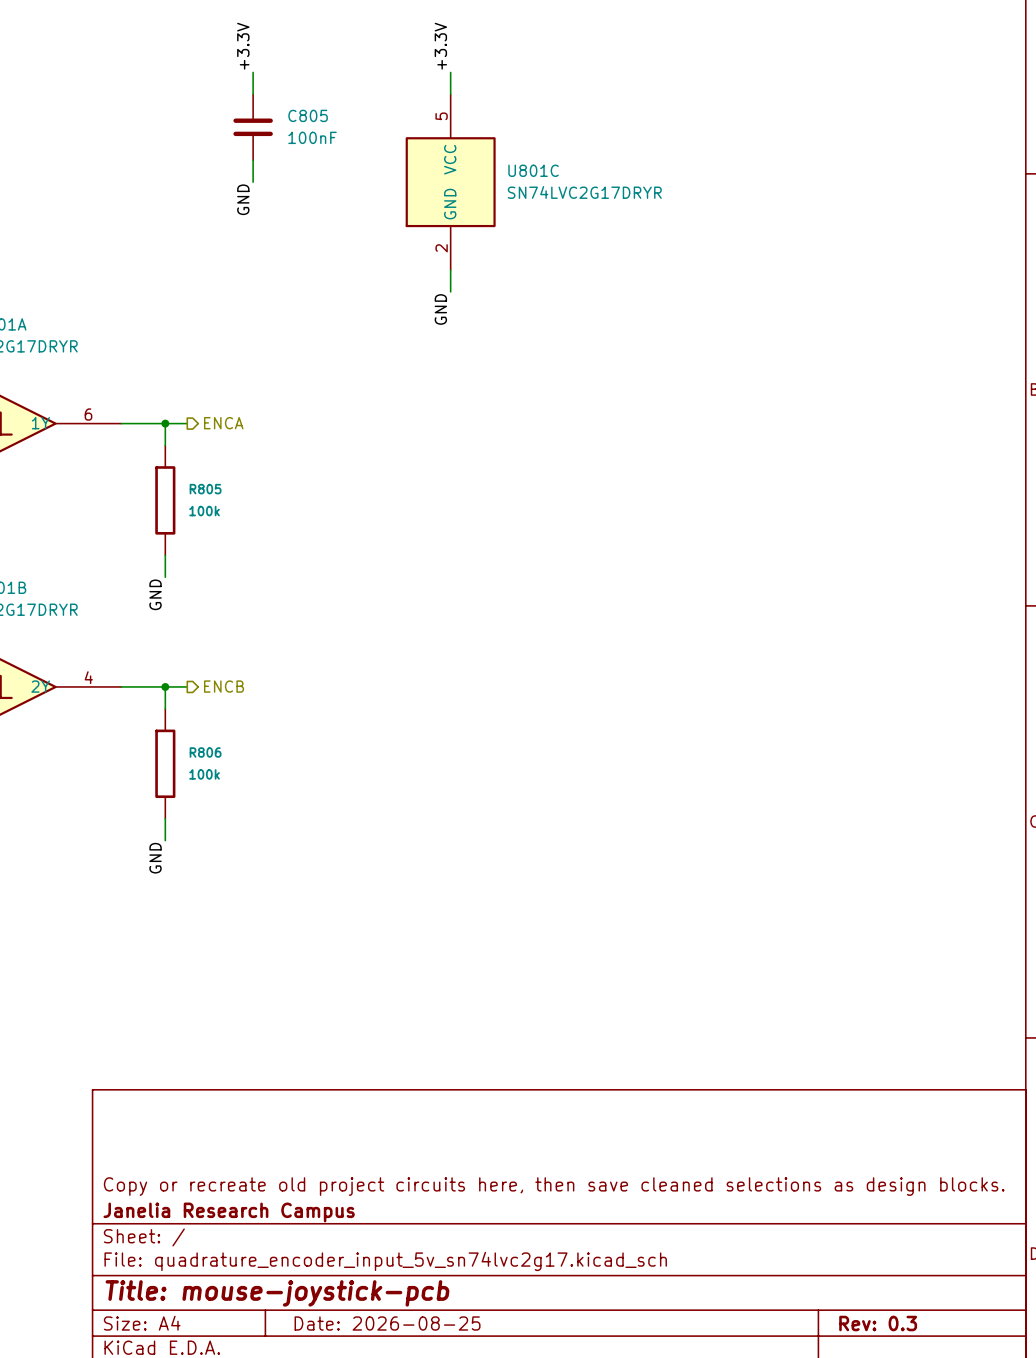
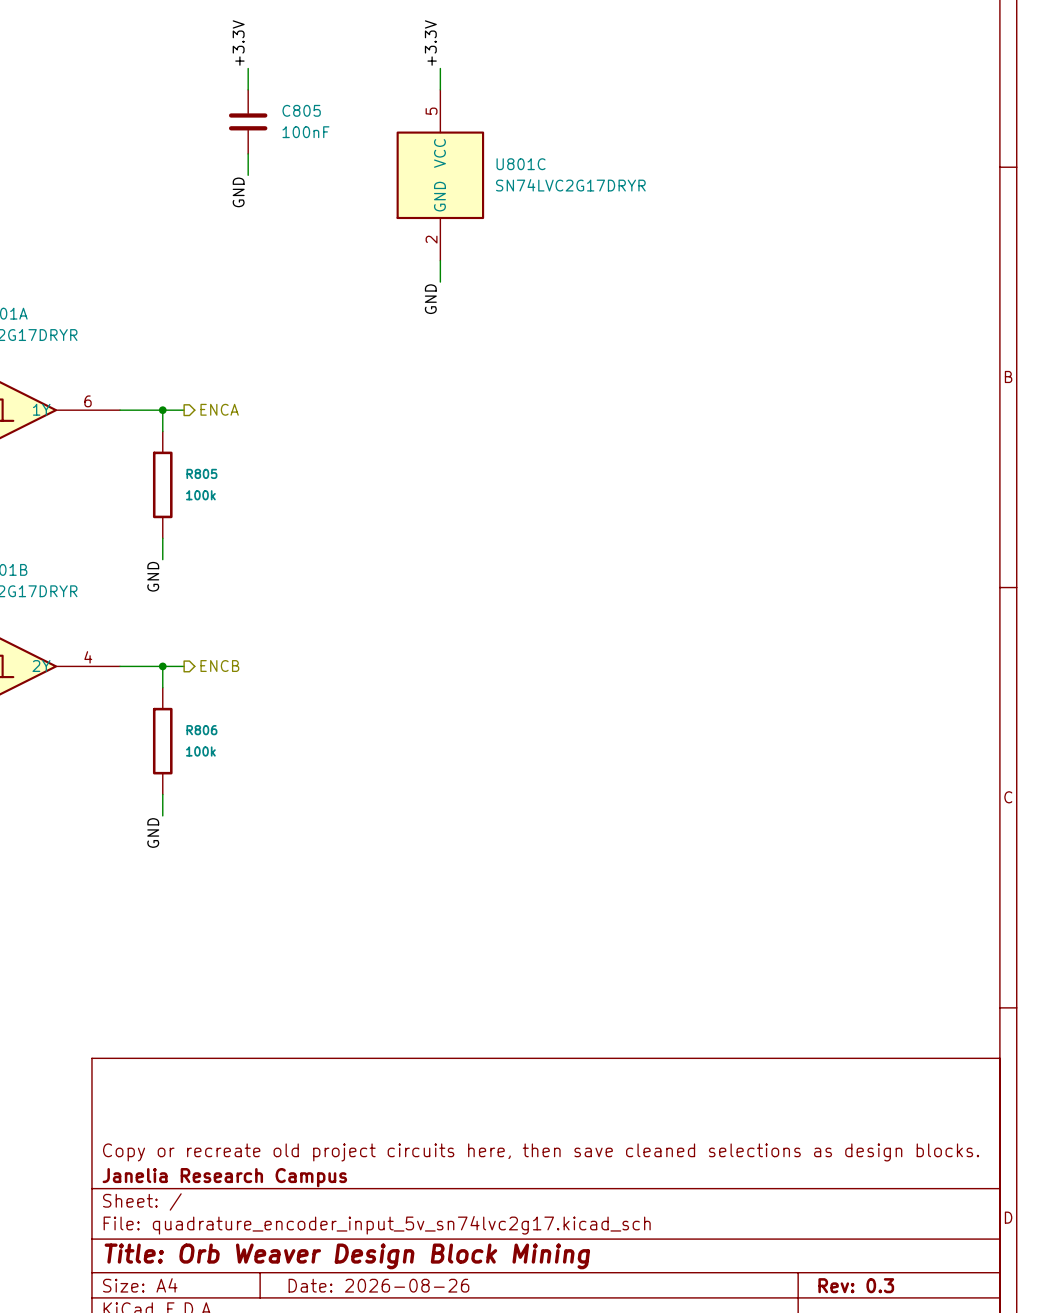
title block: Title: mouse-joystick-pcb (277, 1293) -> Title: Orb Weaver Design Block Mining (347, 1256)
title block: Date: 2026-08-25 (387, 1323) -> Date: 2026-08-26 (378, 1285)

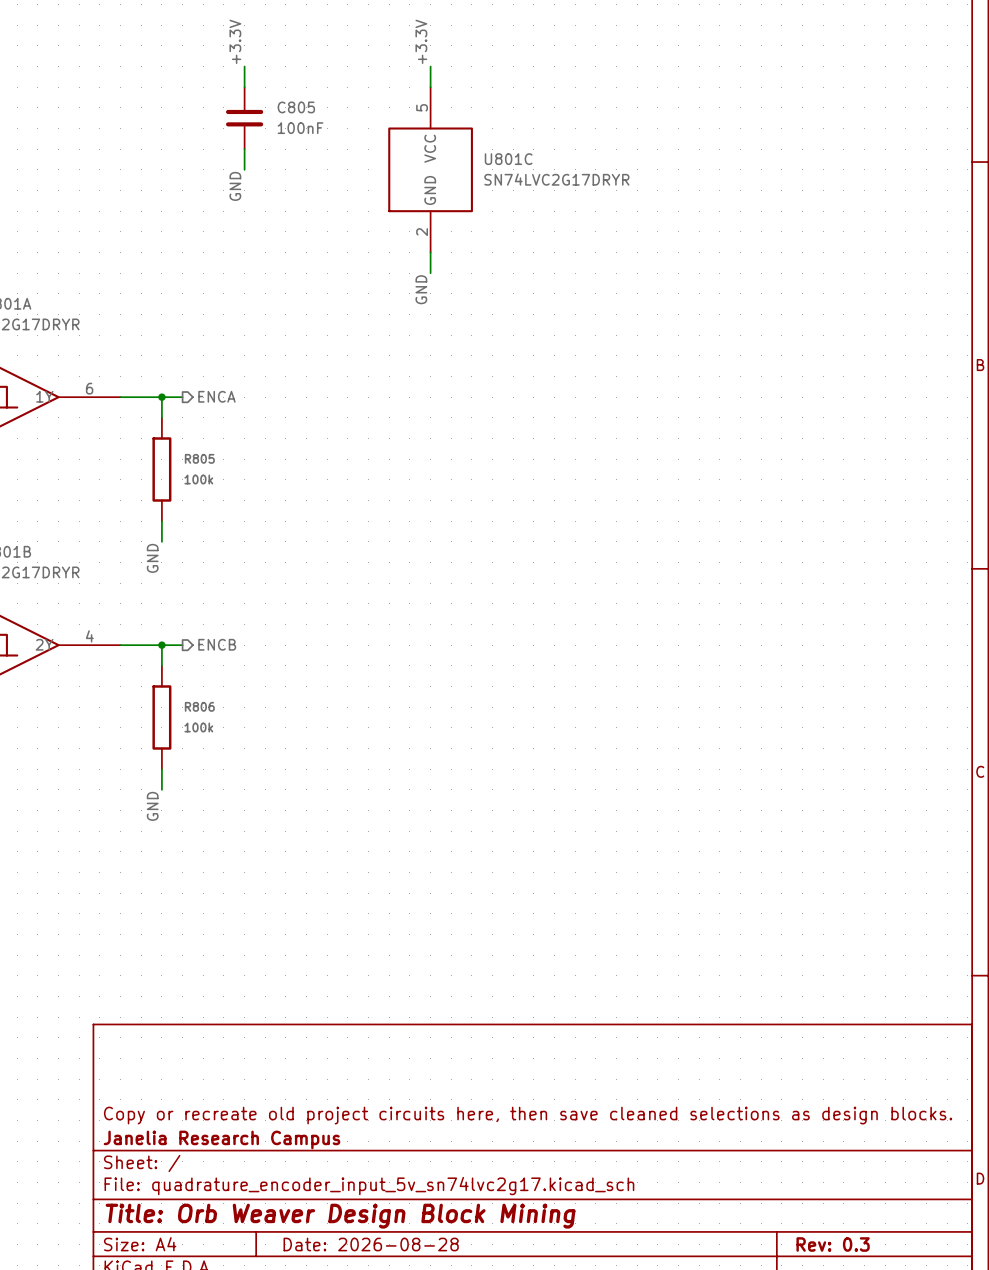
title block: Date: 2026-08-26 (378, 1285) -> Date: 2026-08-28 (371, 1244)

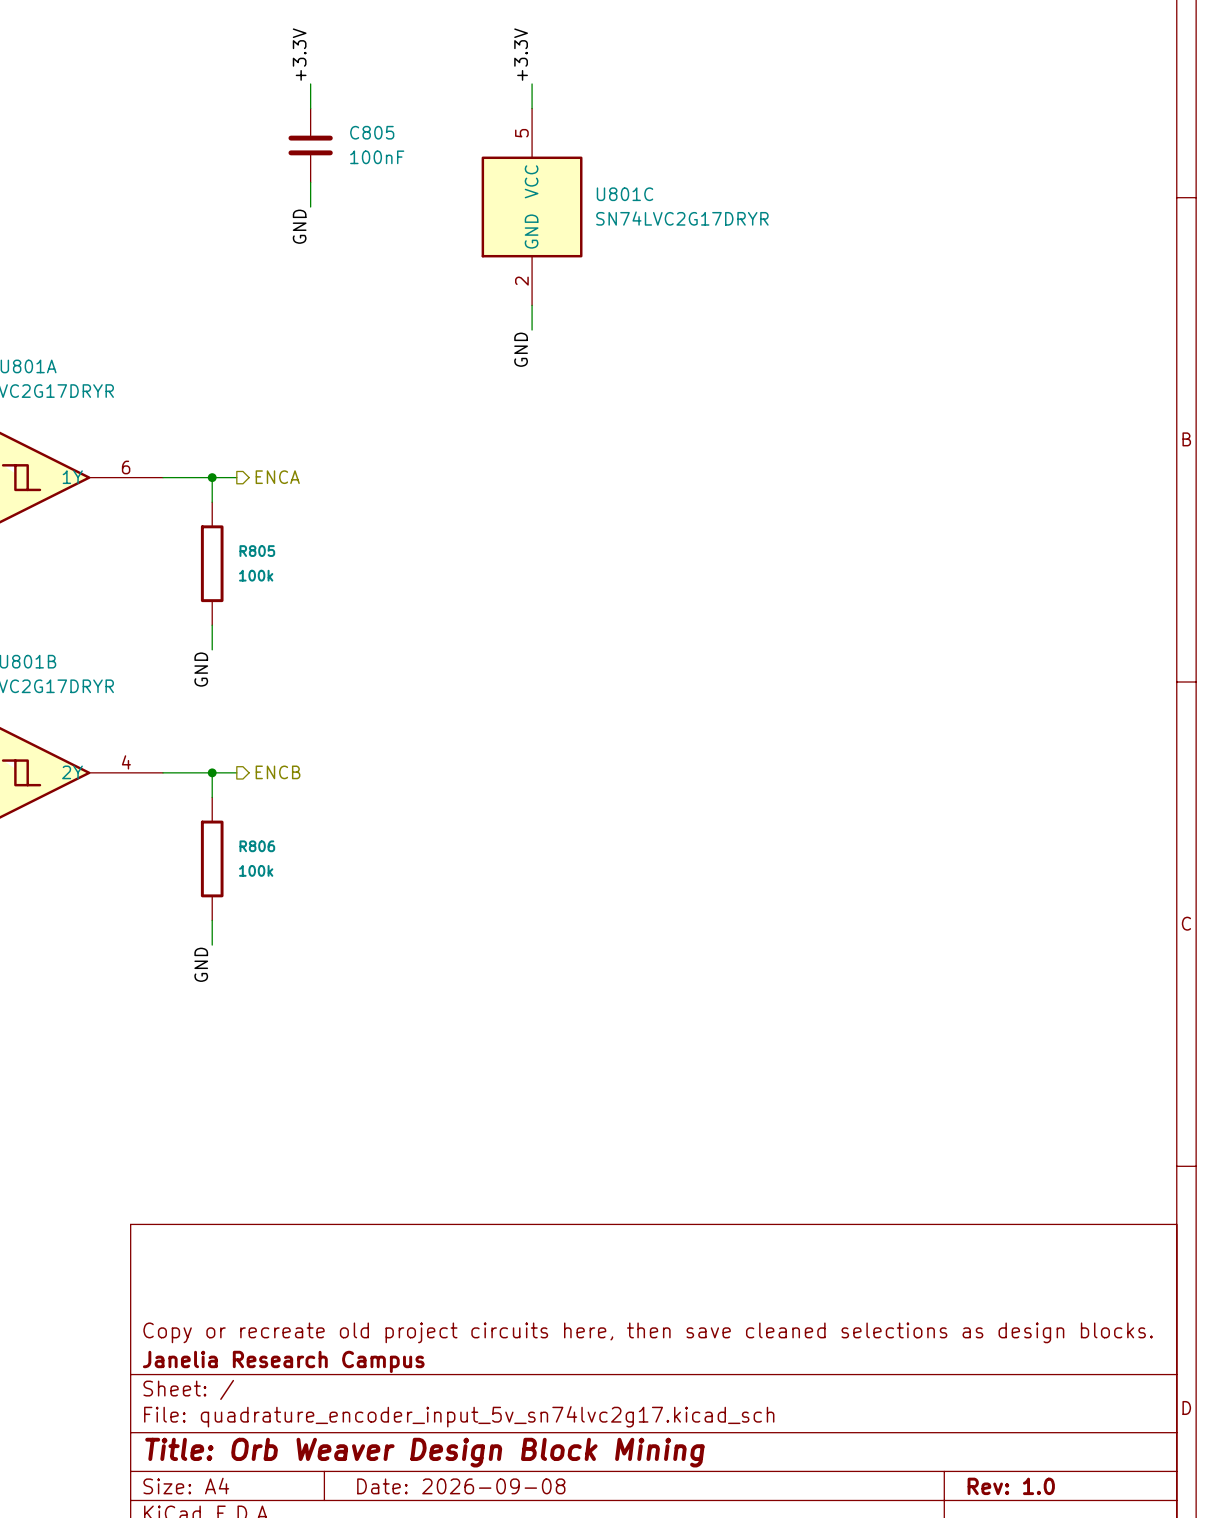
title block: Date: 2026-08-28 (371, 1244) -> Date: 2026-09-08 (461, 1486)
title block: Rev: 0.3 (833, 1244) -> Rev: 1.0 (1011, 1486)

